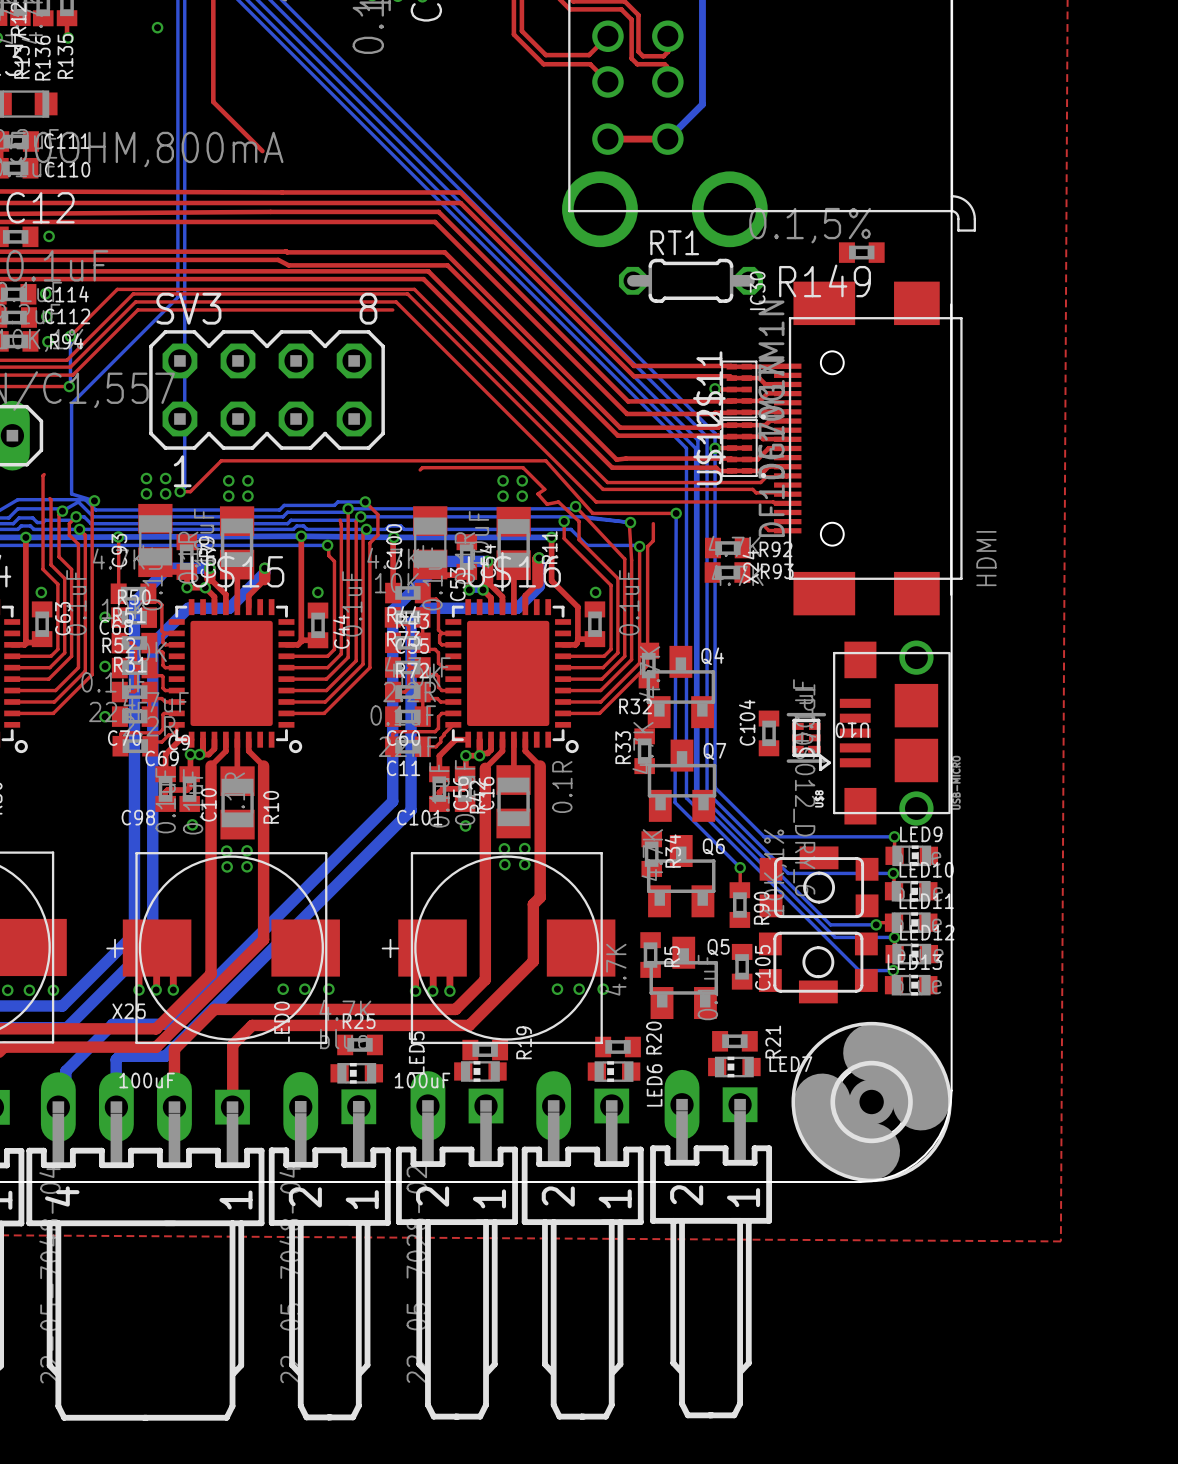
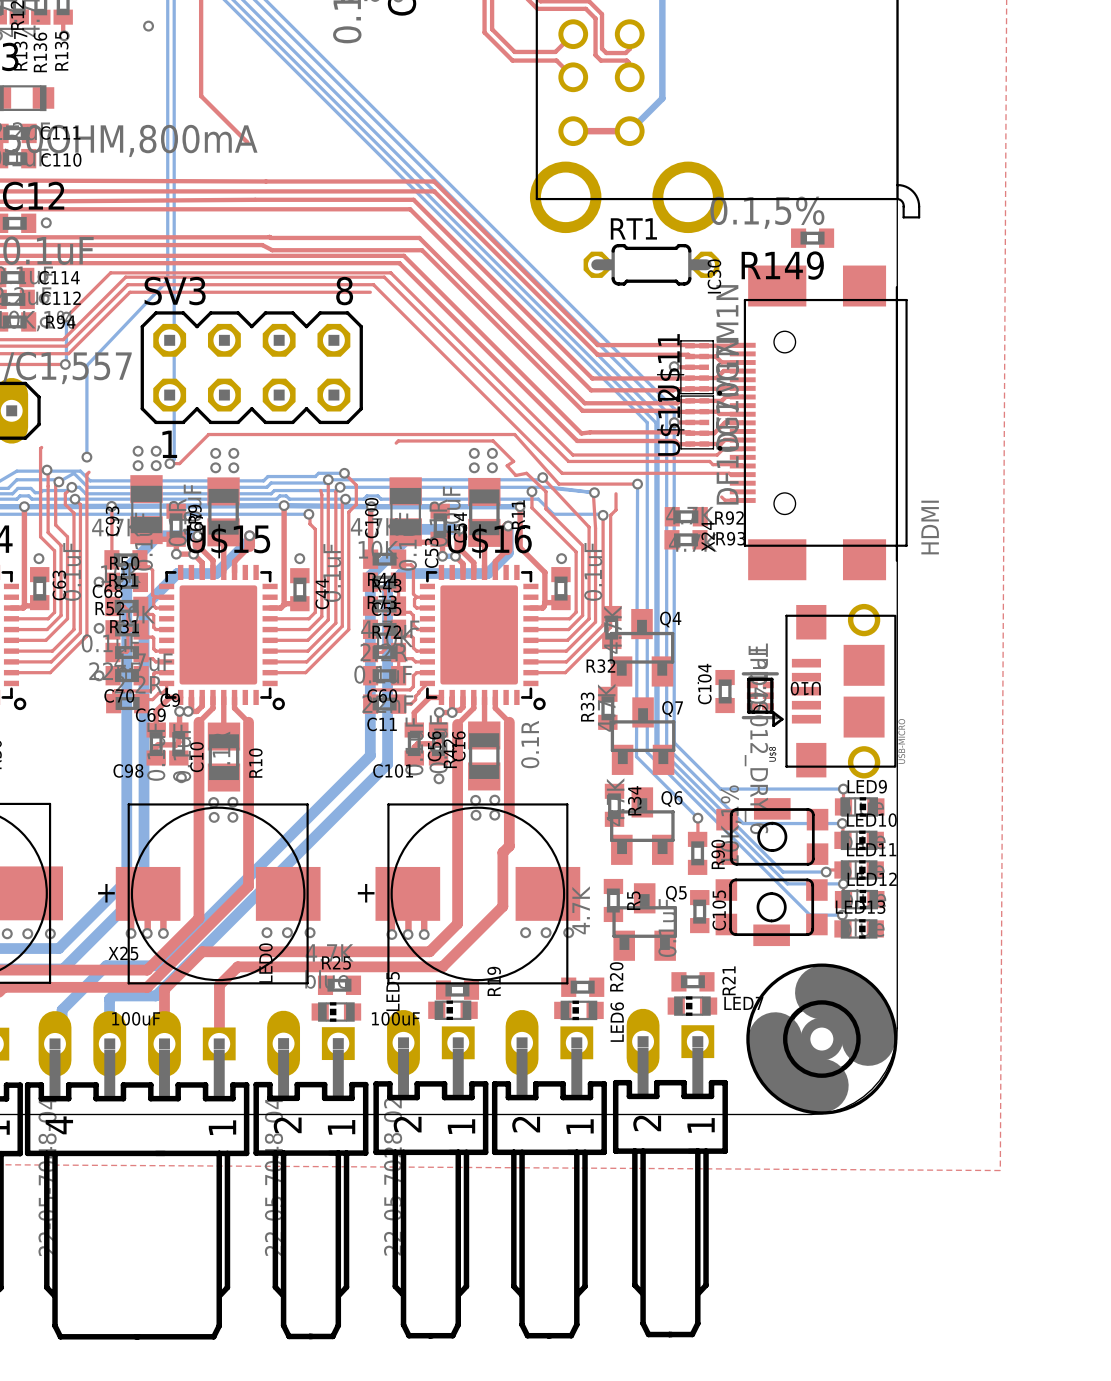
bottom track: (177, 297) (71, 403) (71, 493) (94, 500) -> (167, 280) (86, 365) (86, 457)
via: none -> (47, 470)
via position: (94, 500) -> (86, 457)

